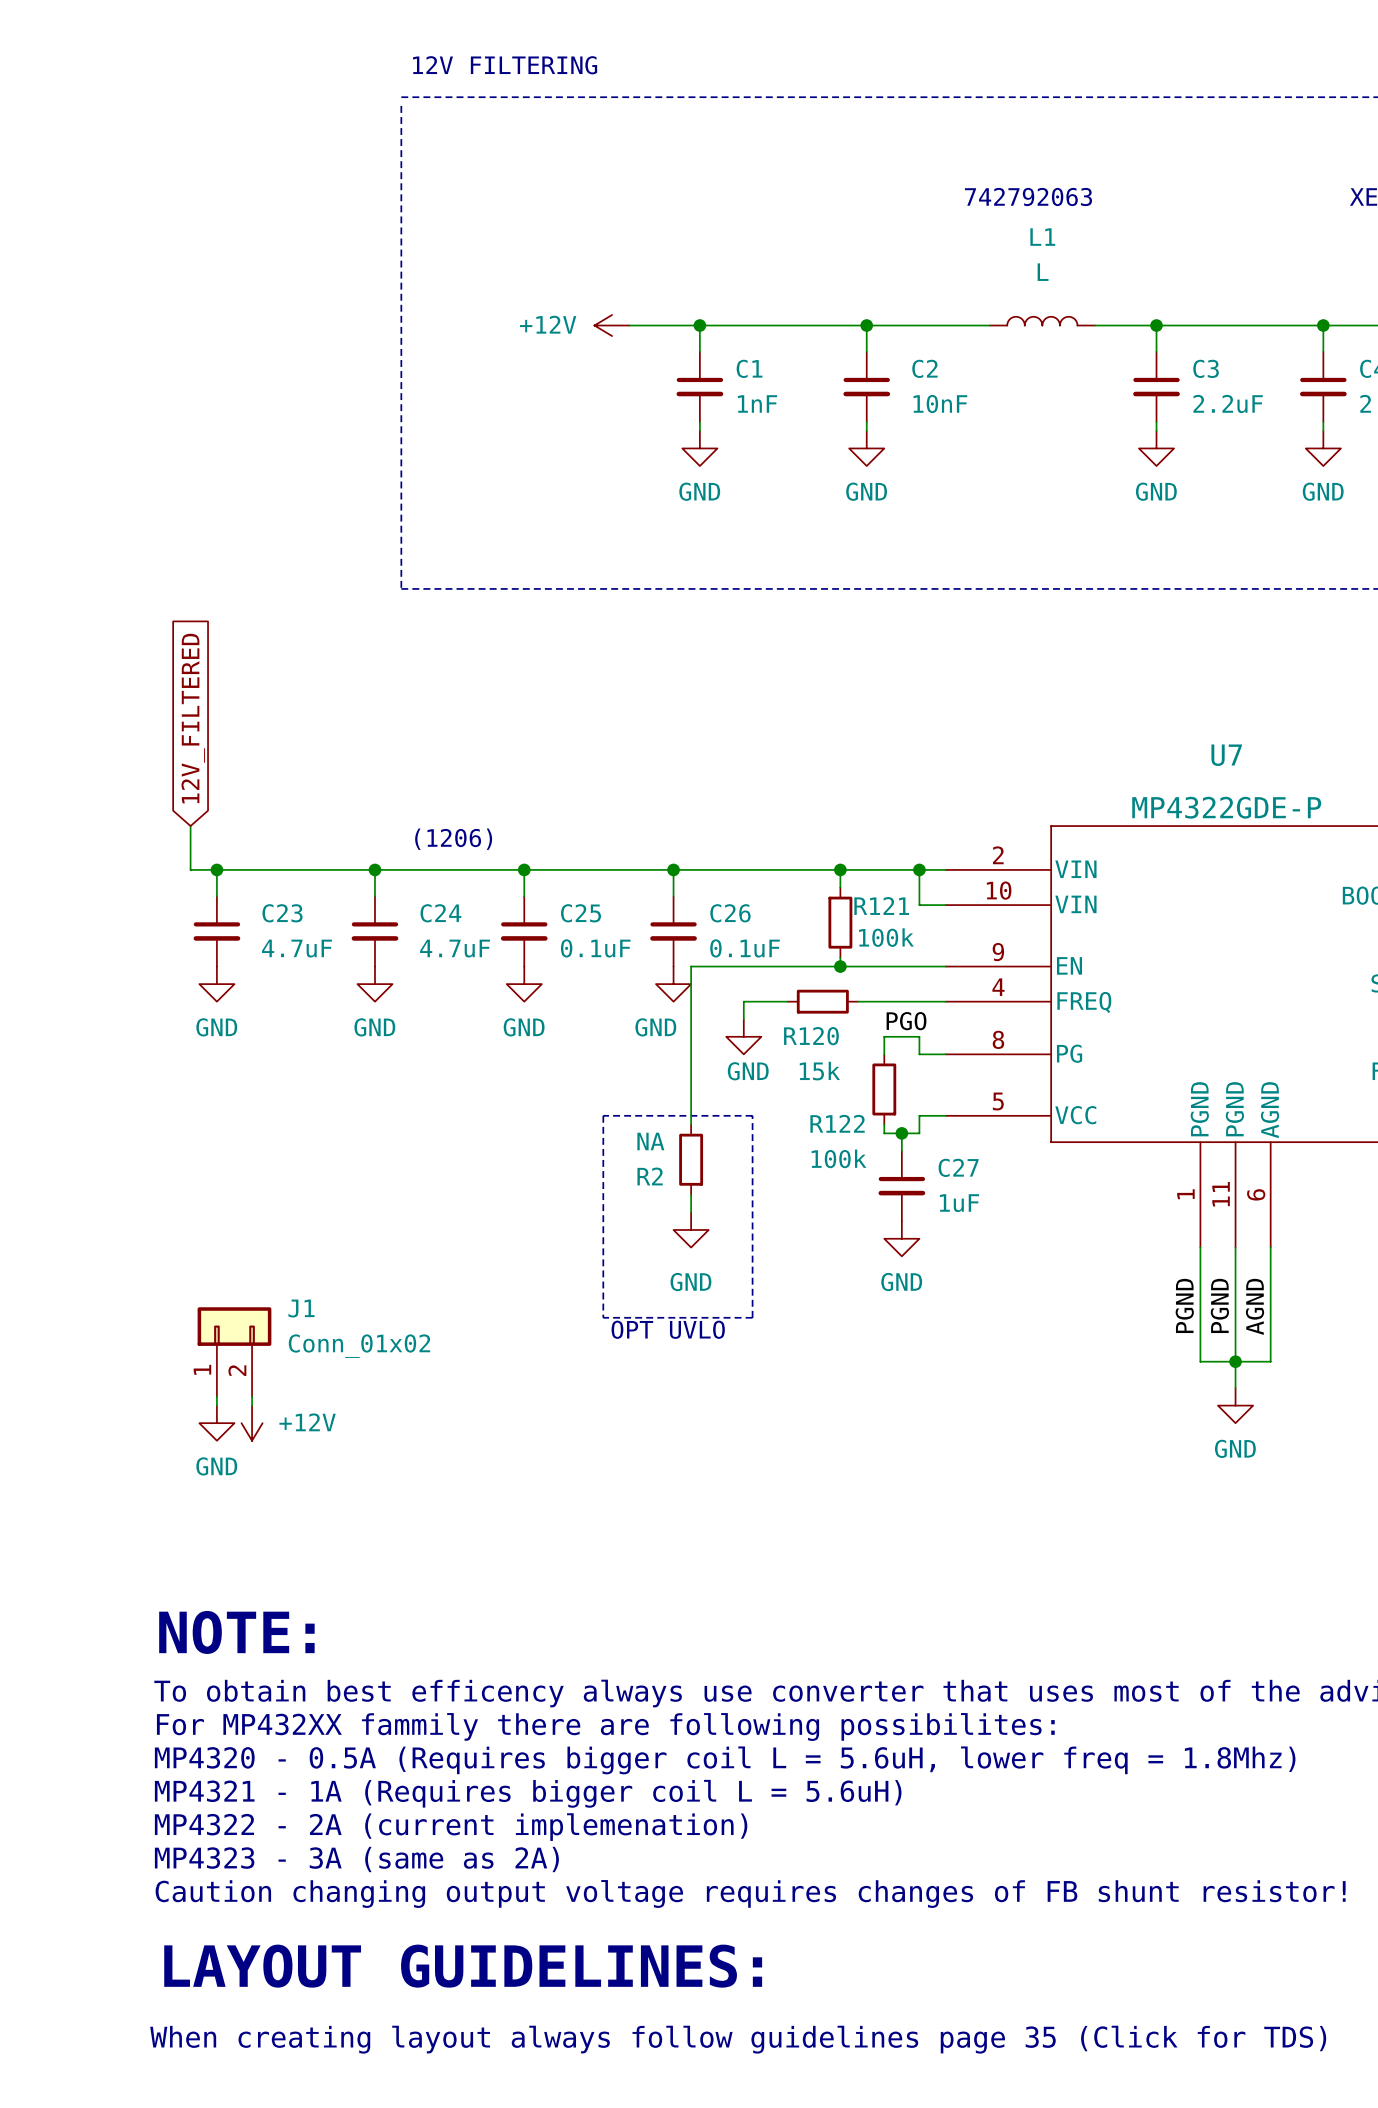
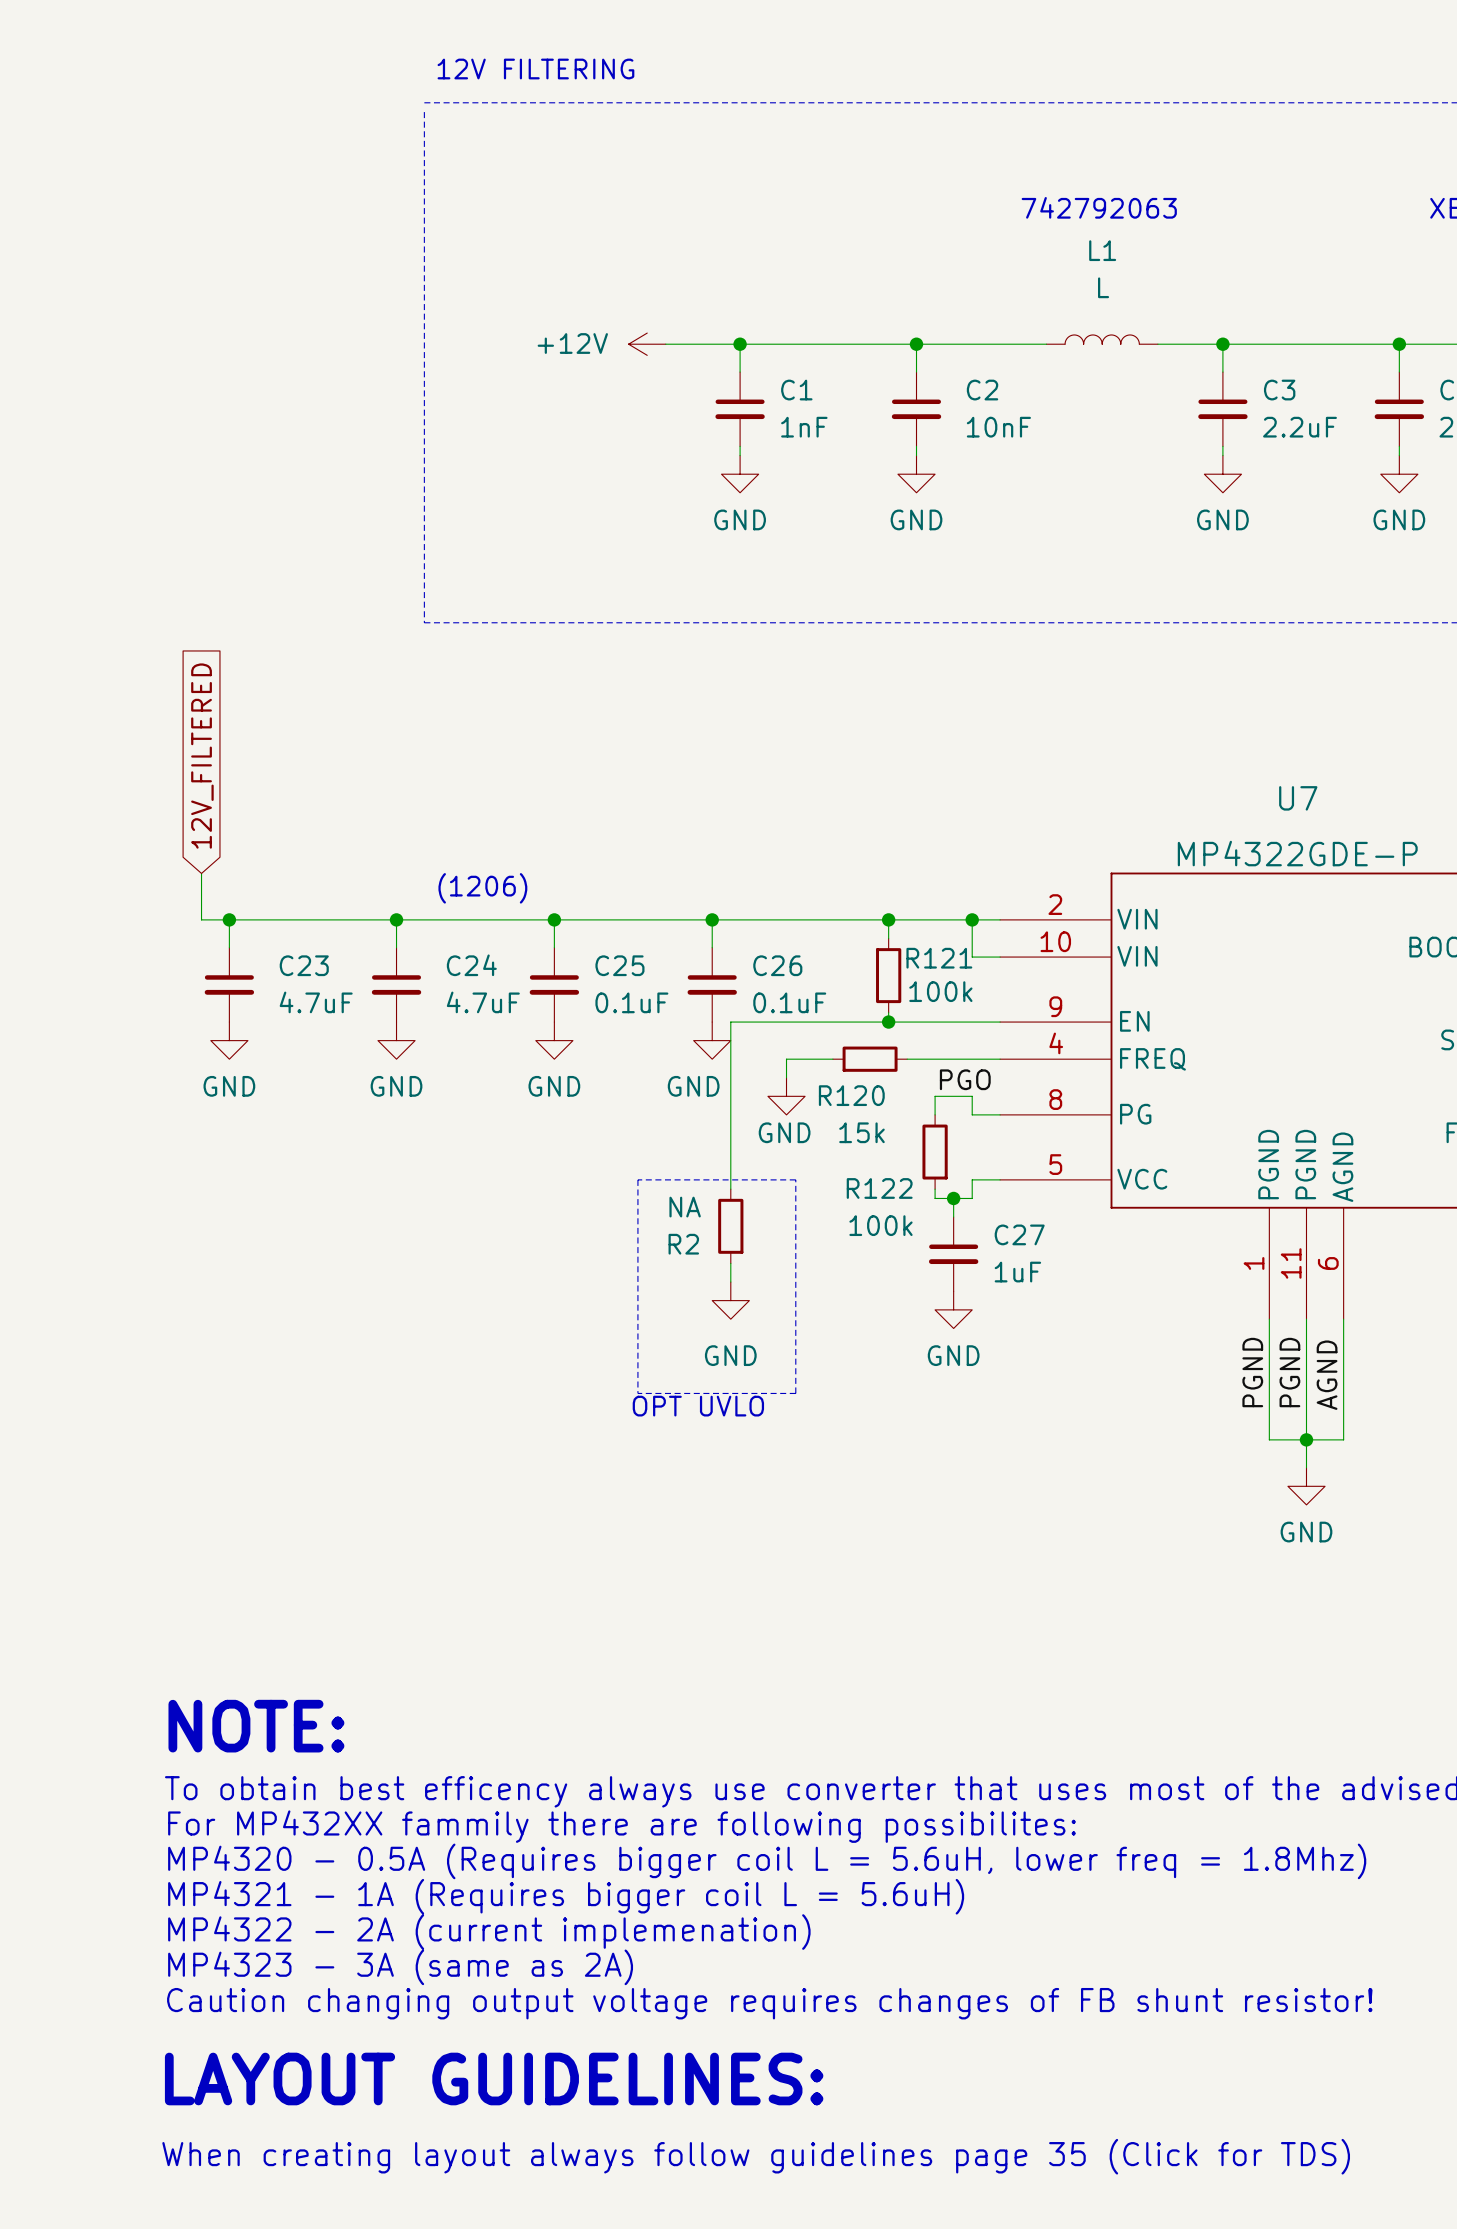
J1: Conn_01x02 (234, 1352) -> none
wire: (216, 1396) (216, 1405) -> none
wire: (252, 1396) (252, 1405) -> none
power symbol: GND (216, 1423) -> none
power symbol: +12V (252, 1423) -> none

